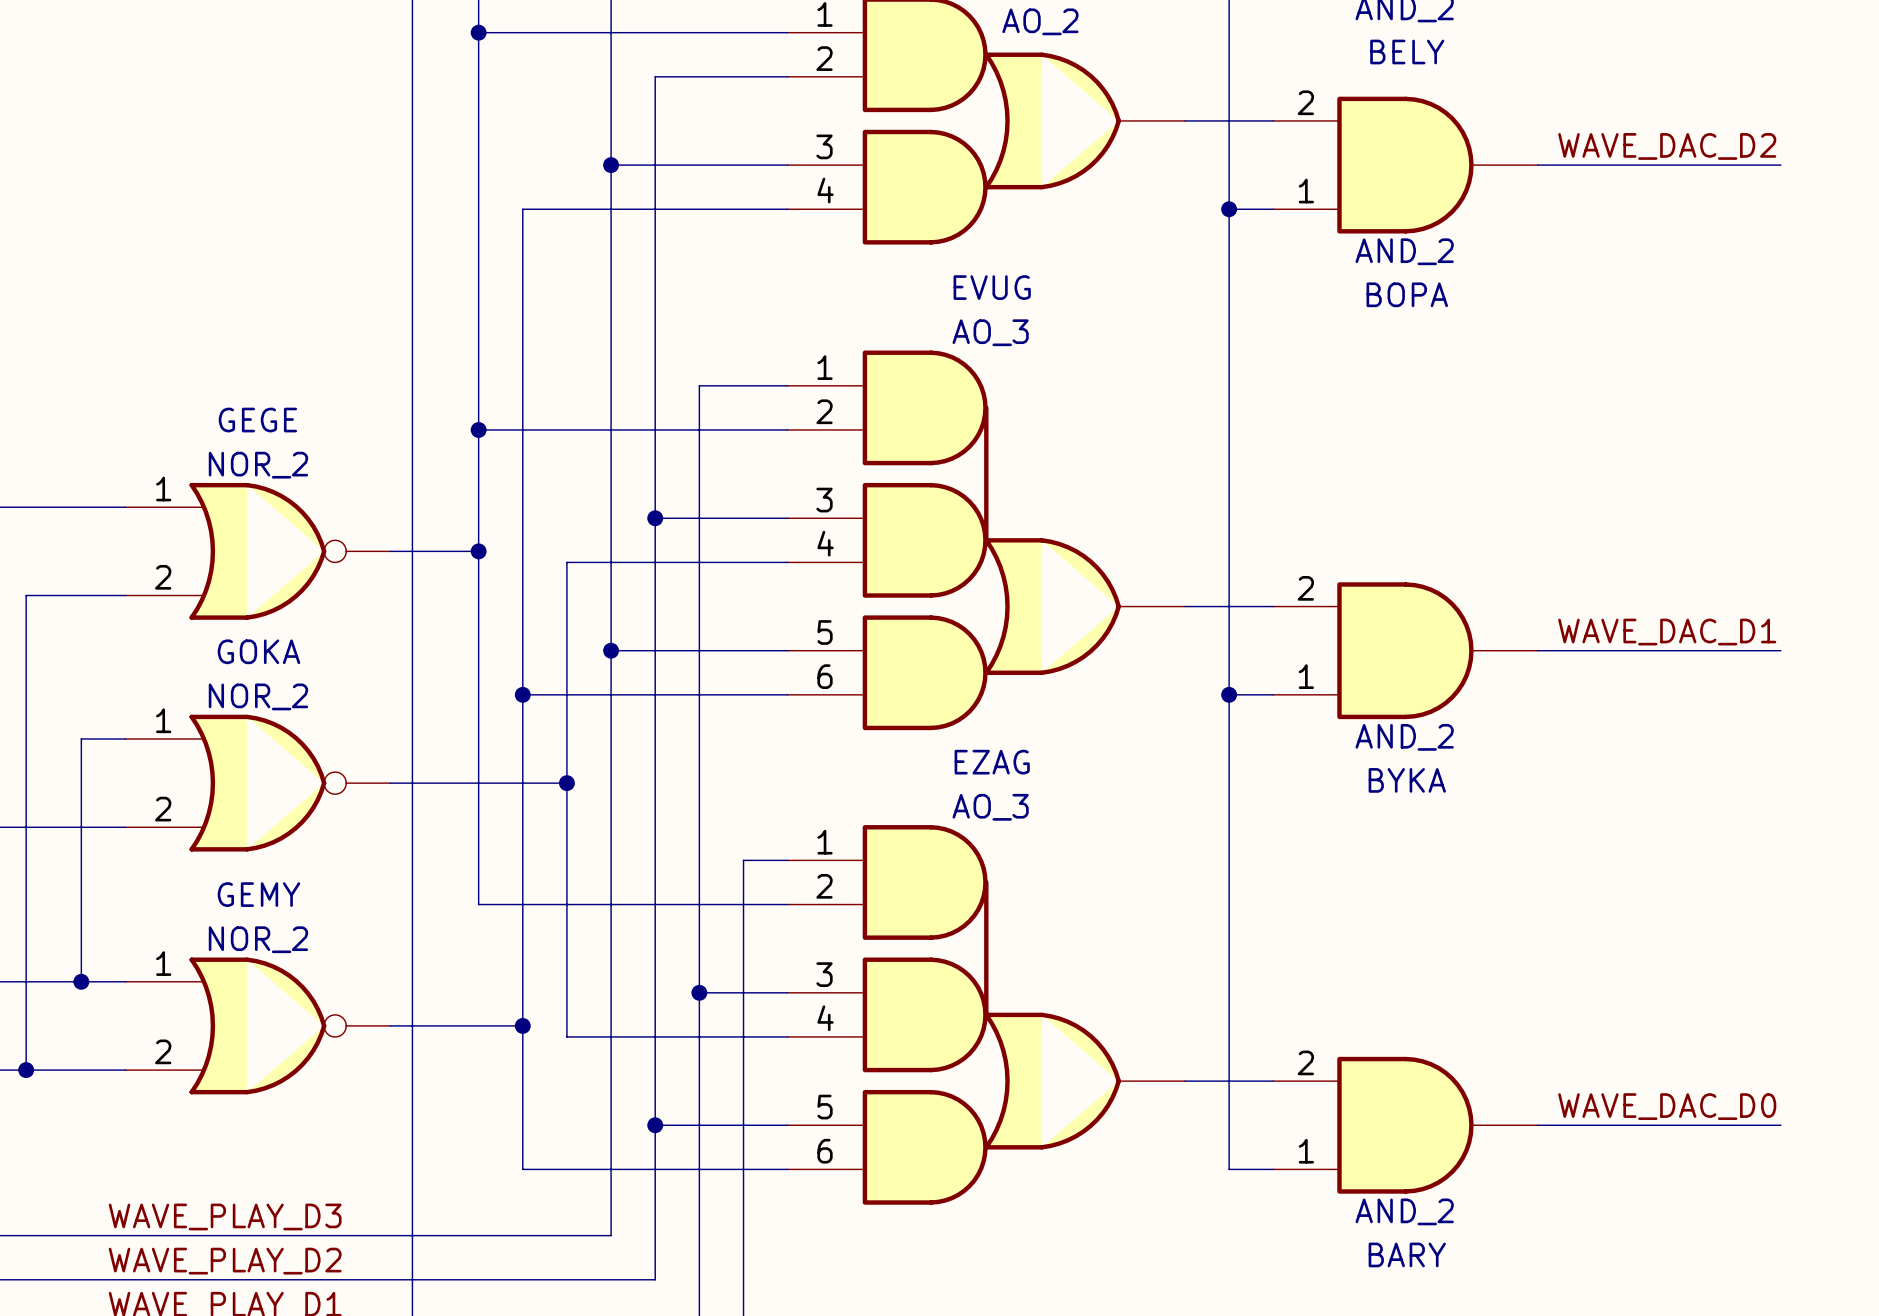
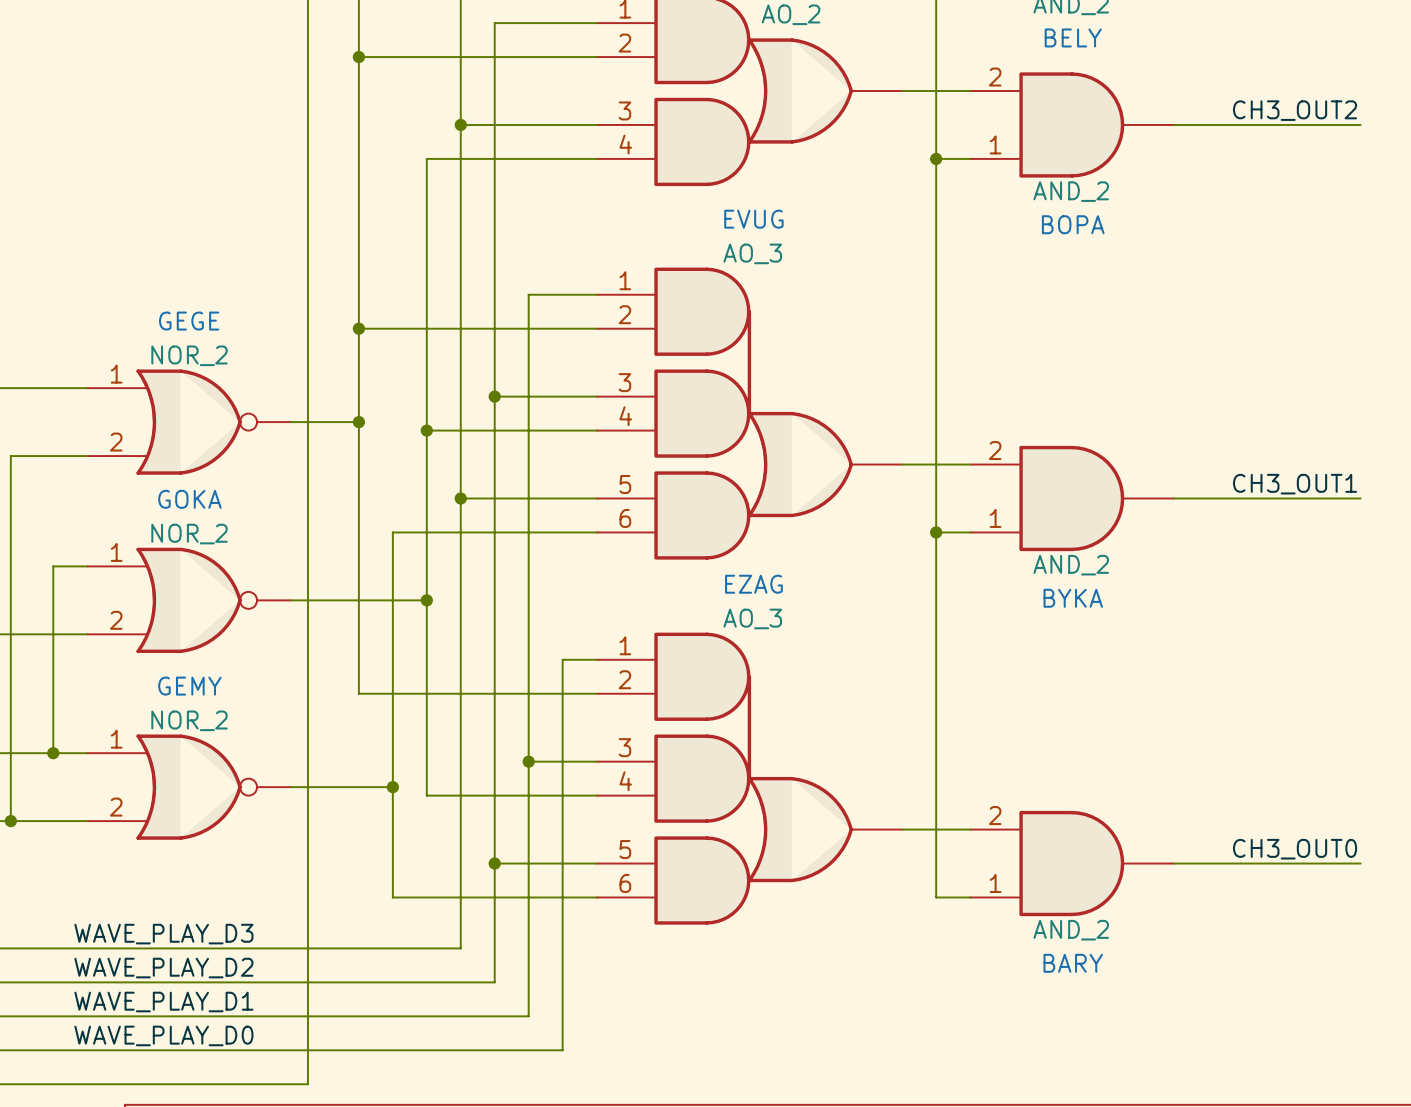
wire: (478, 32) (655, 32) -> (358, 57) (494, 57) (494, 23)
junction position: (478, 32) -> (358, 57)
label: WAVE_DAC_D2 (1667, 146) -> CH3_OUT2 (1295, 110)
wire: (566, 209) (522, 209) (522, 694) -> (426, 158) (426, 430)
junction: none -> (426, 430)
label: WAVE_DAC_D1 (1667, 632) -> CH3_OUT1 (1295, 484)
junction: (522, 694) -> none
label: WAVE_DAC_D0 (1667, 1106) -> CH3_OUT0 (1295, 849)

